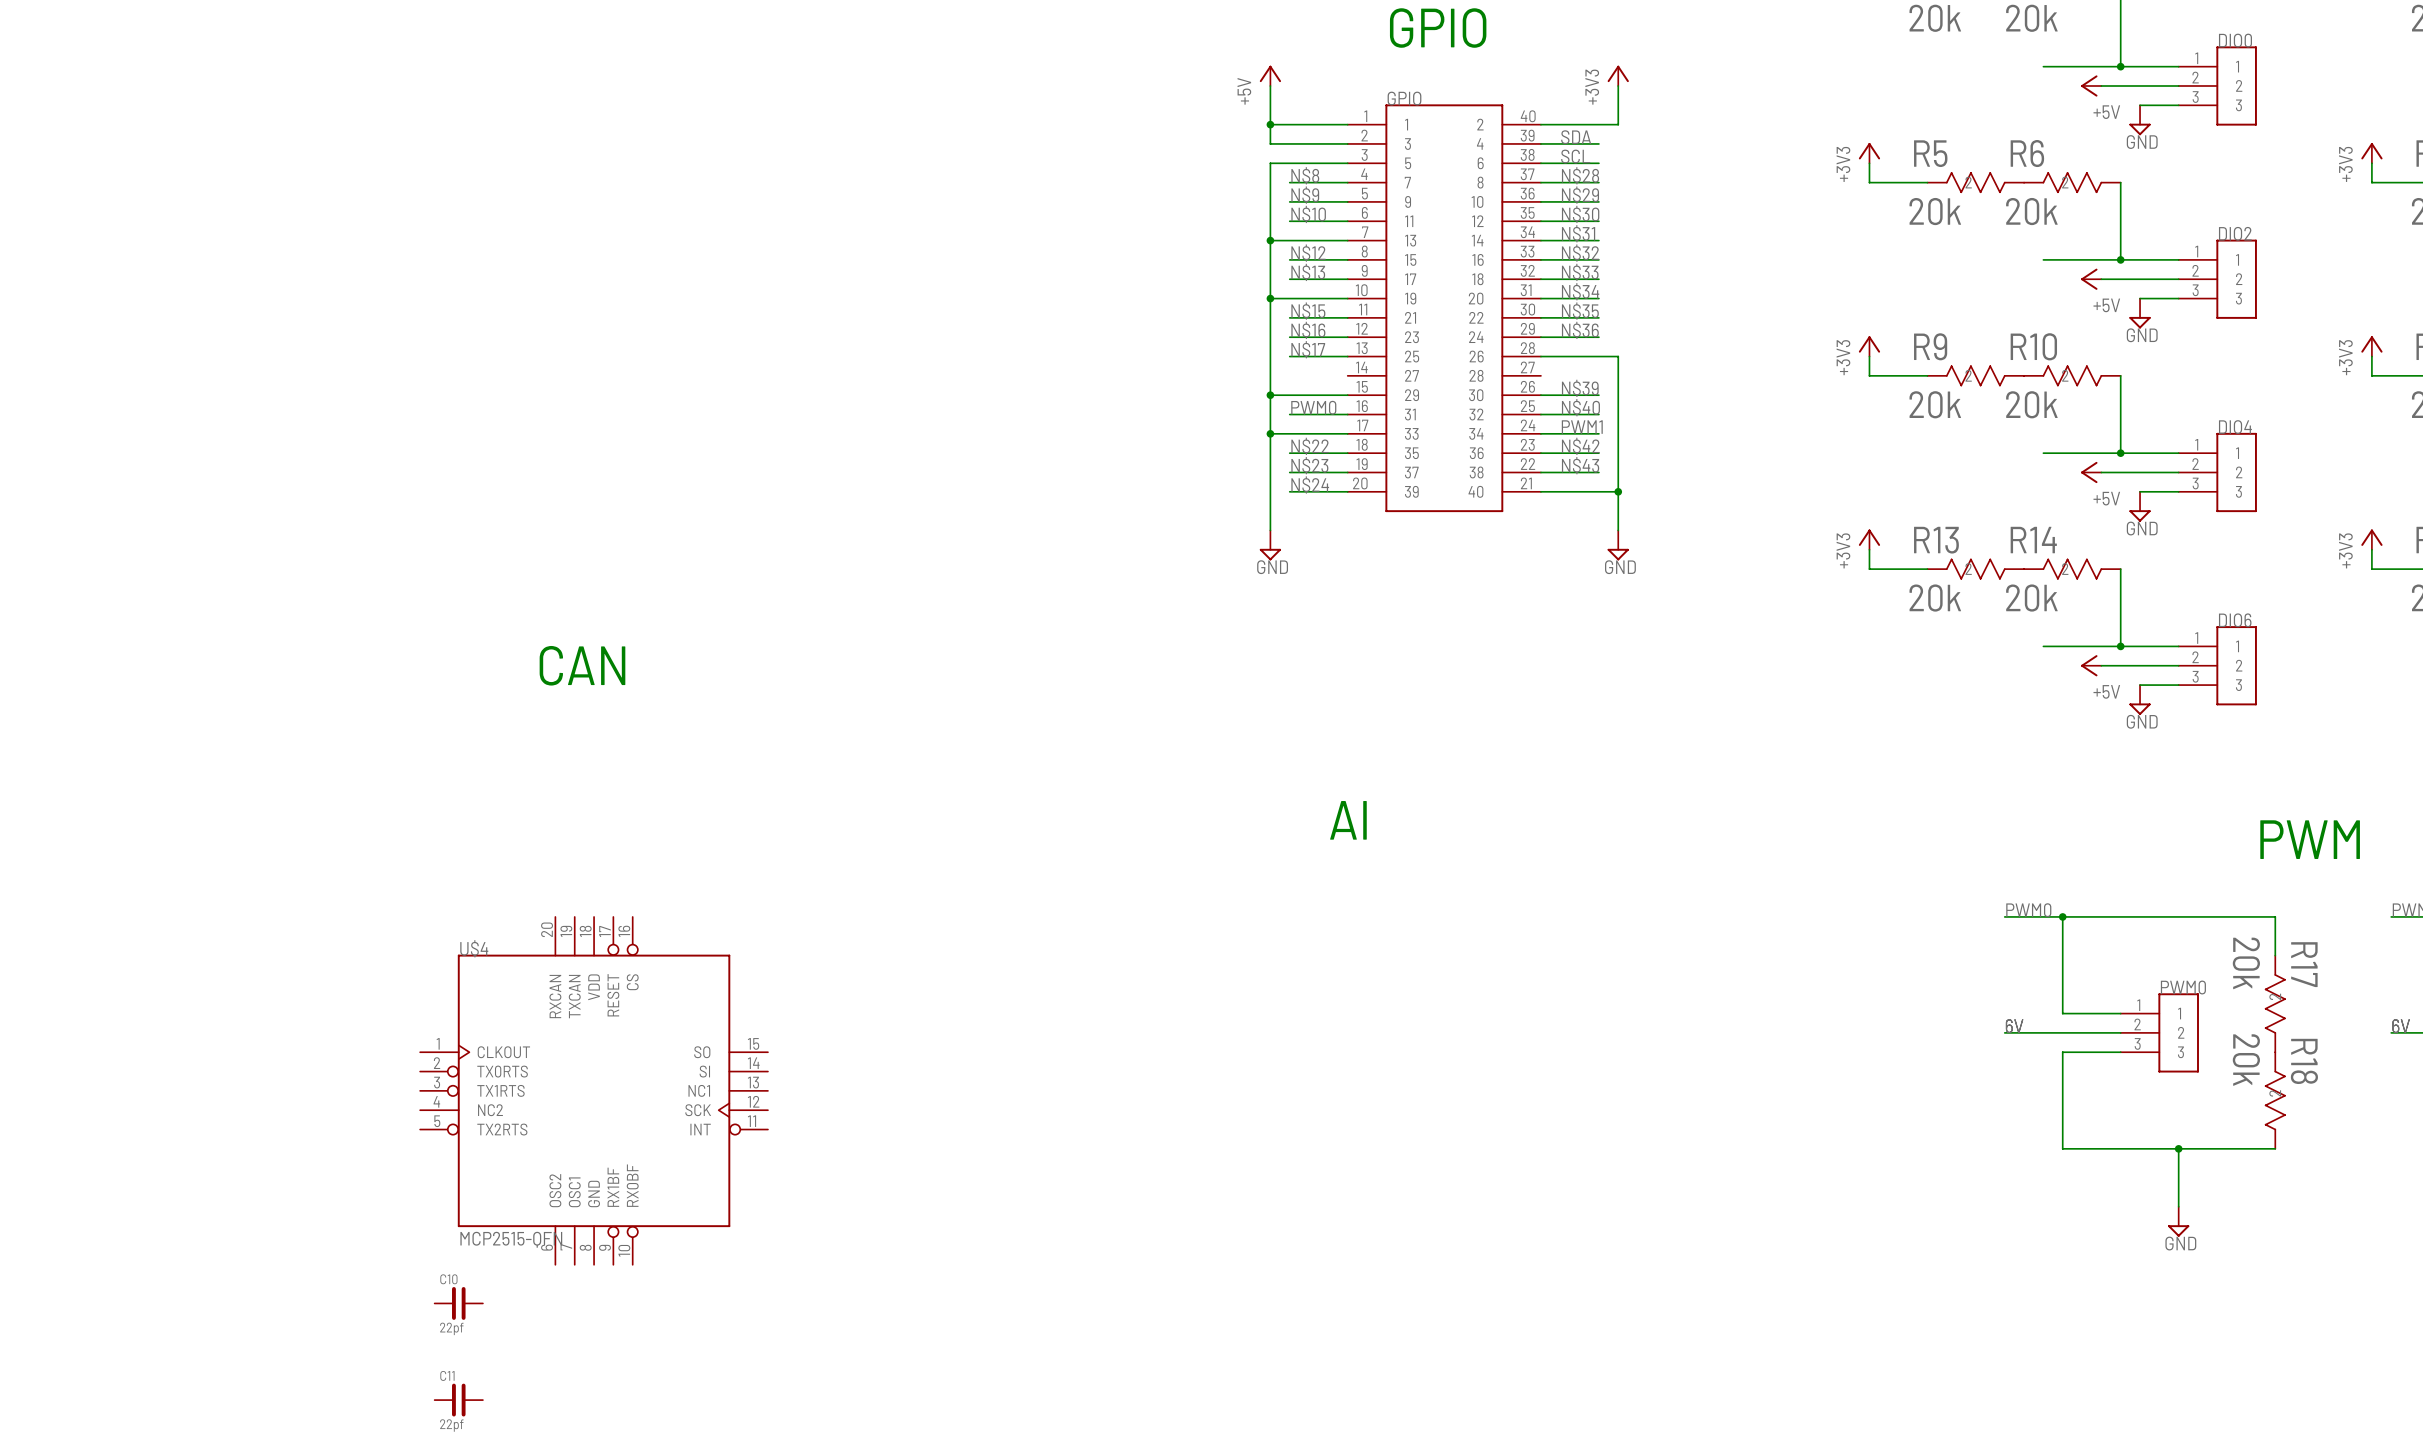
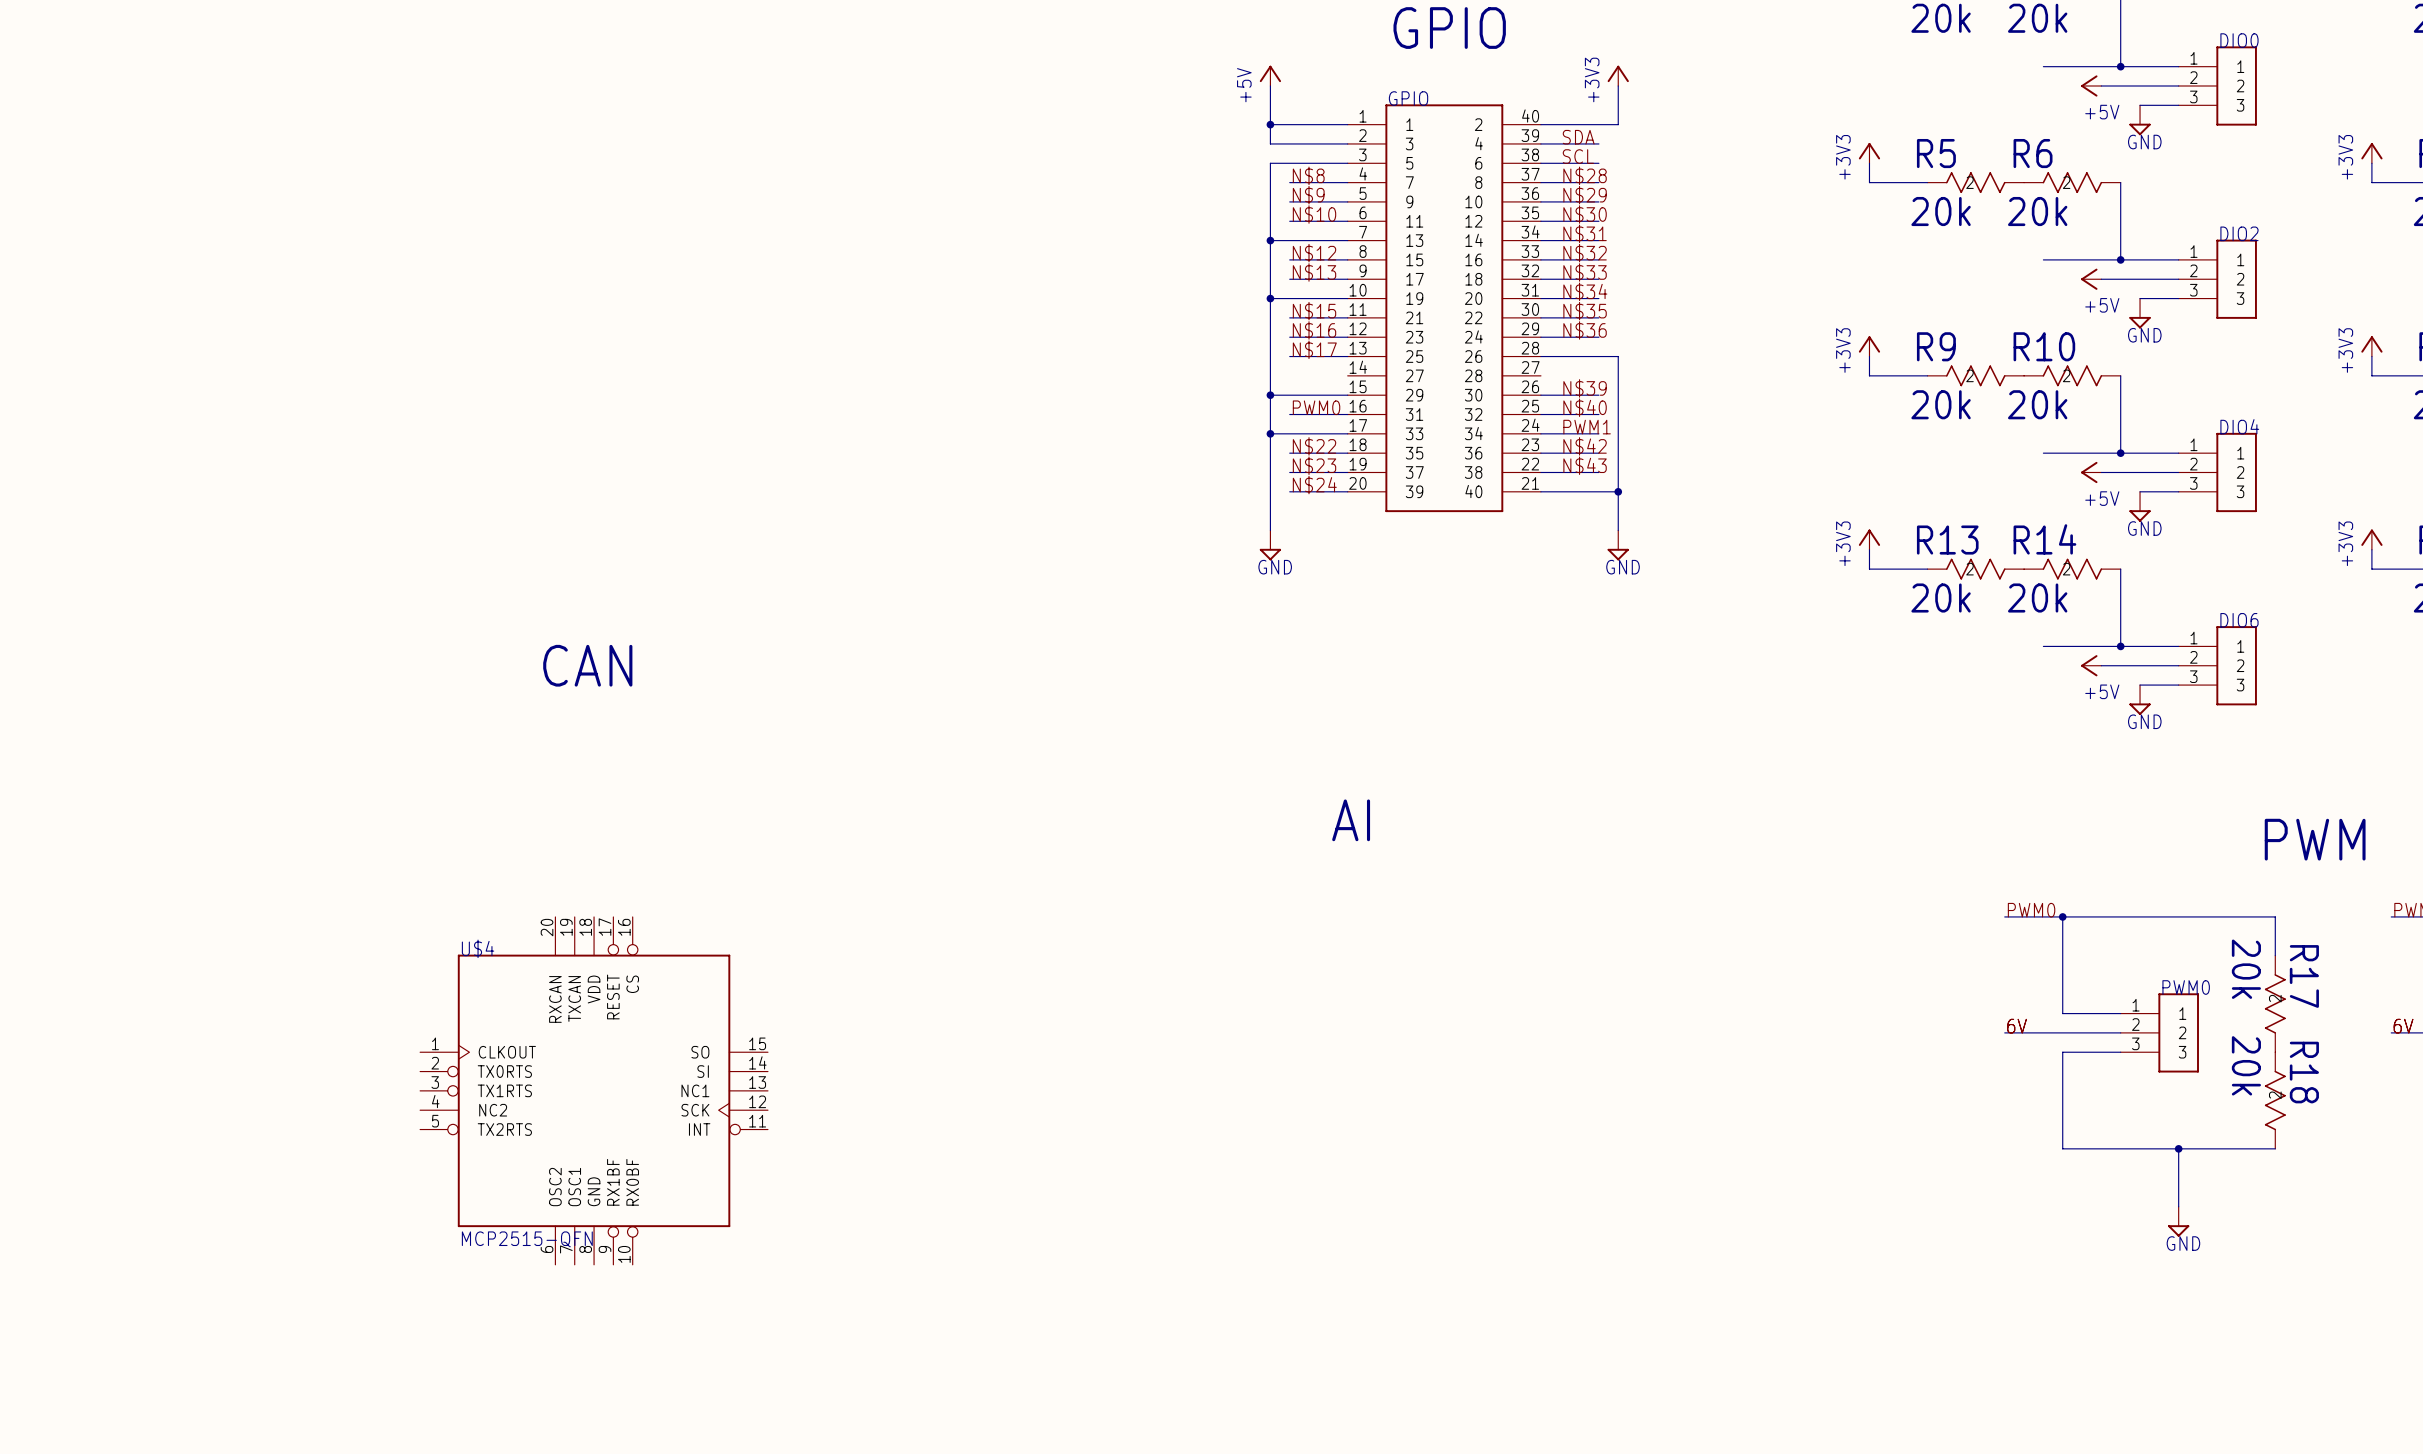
C10: 22pf (458, 1303) -> none
C11: 22pf (458, 1400) -> none

